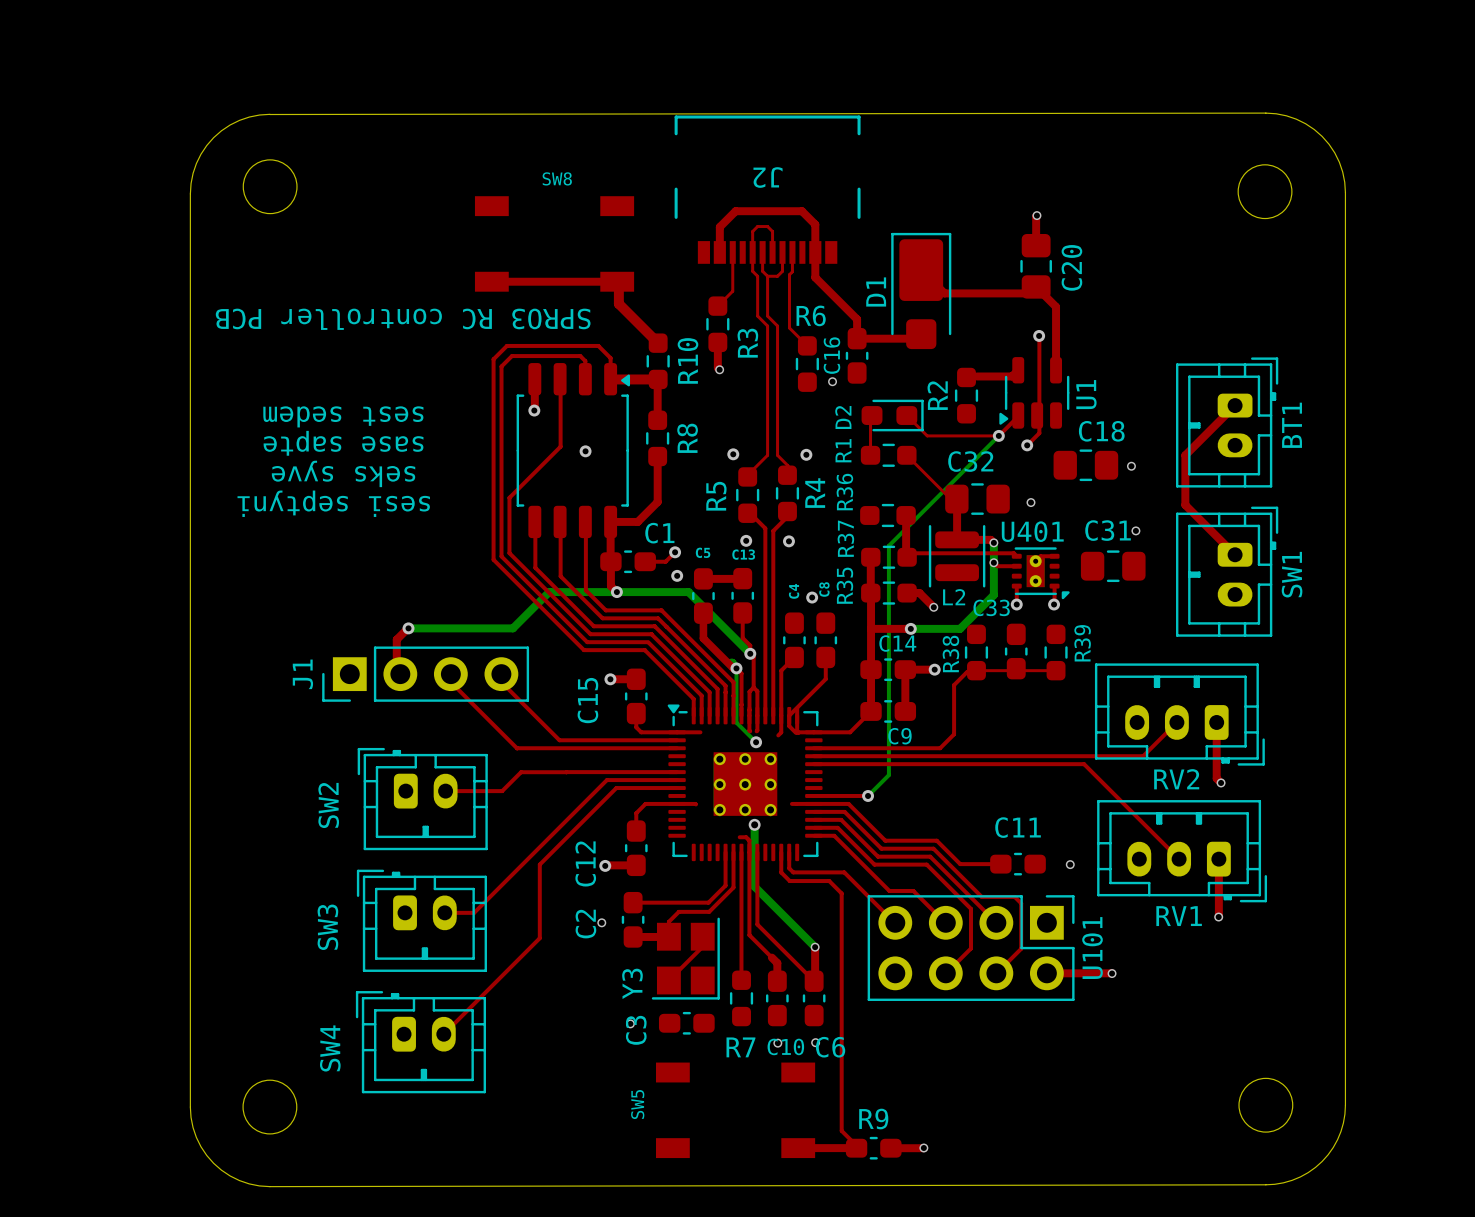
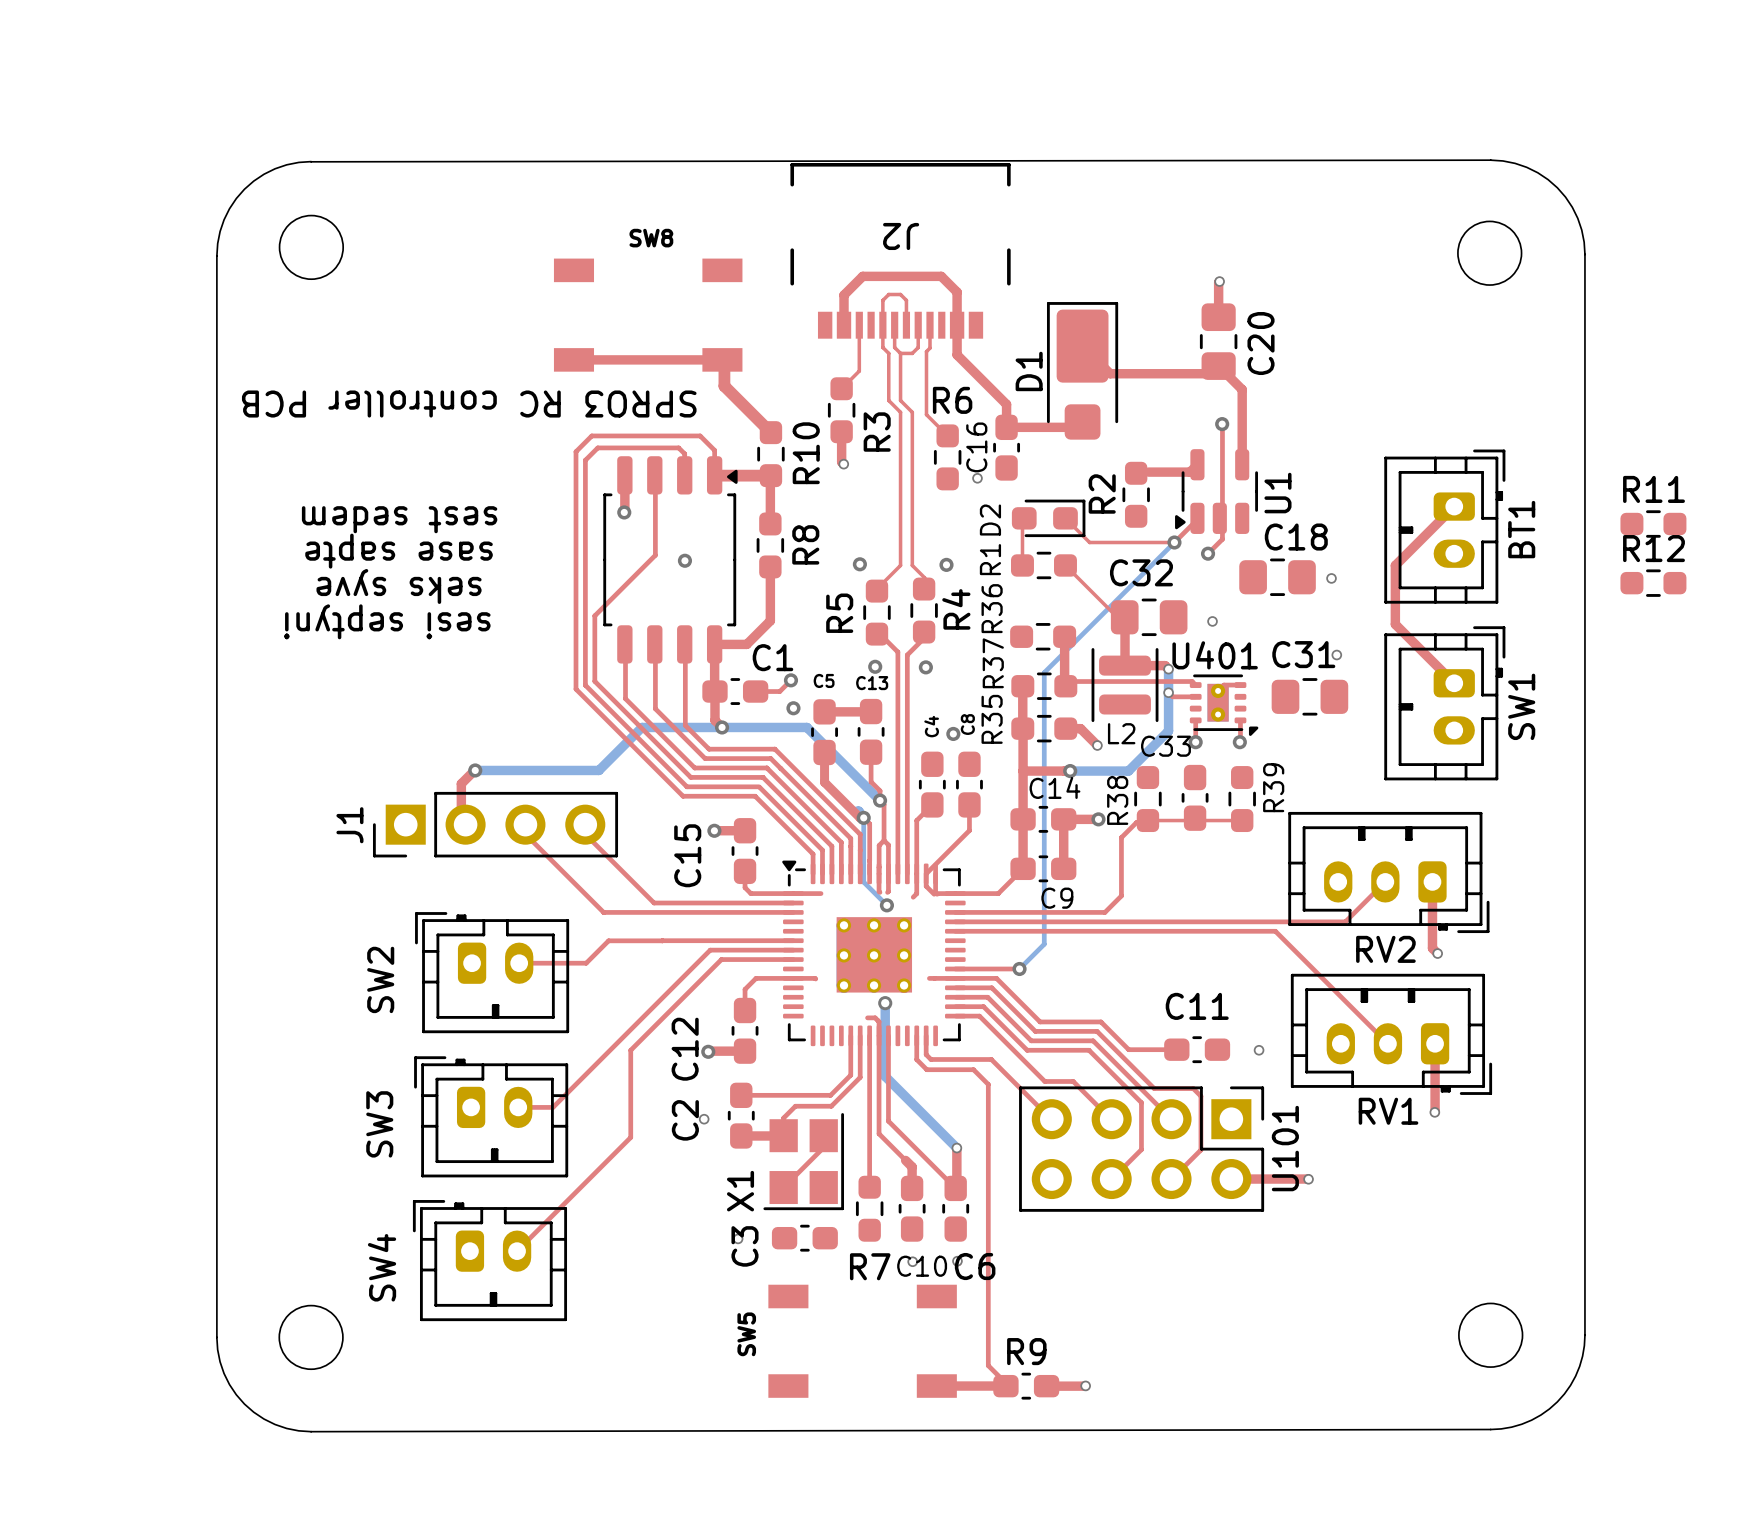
R11: none -> (1653, 524)
R12: none -> (1653, 583)
Y3 name: Y3 (632, 983) -> X1 (740, 1191)

